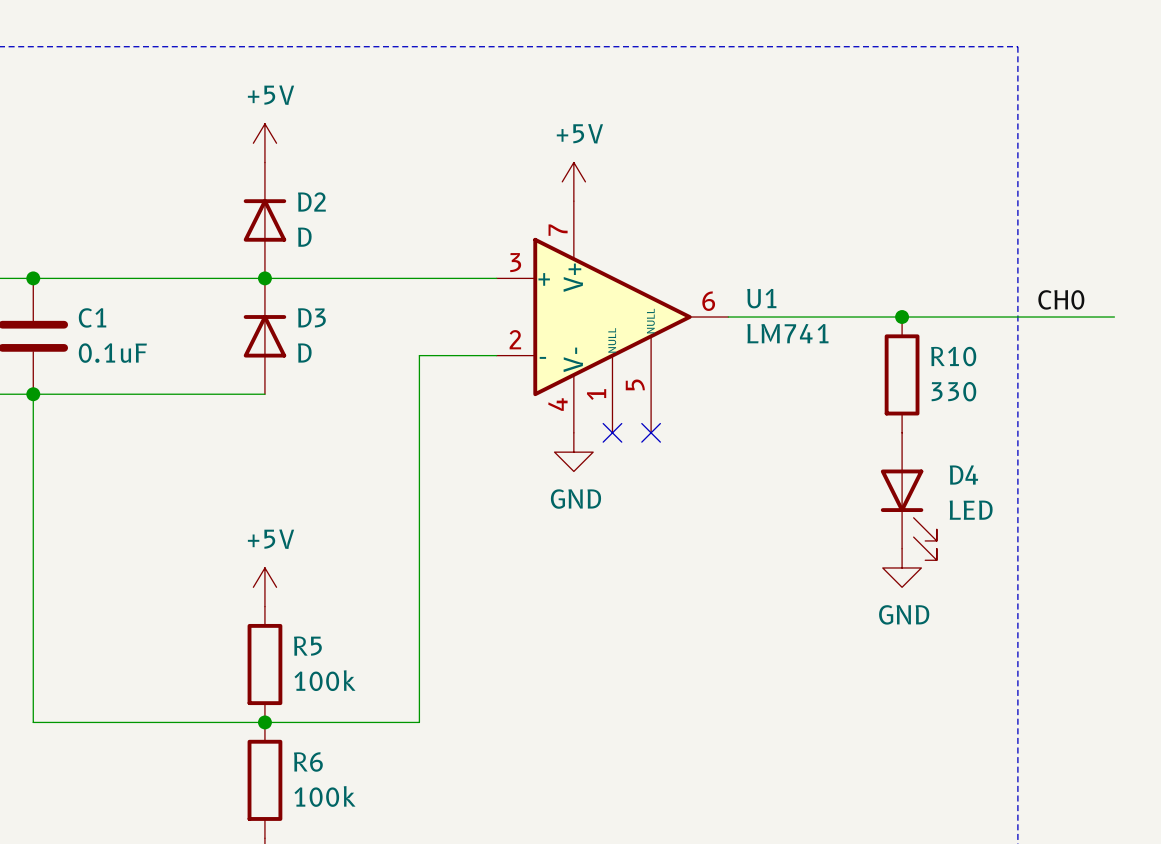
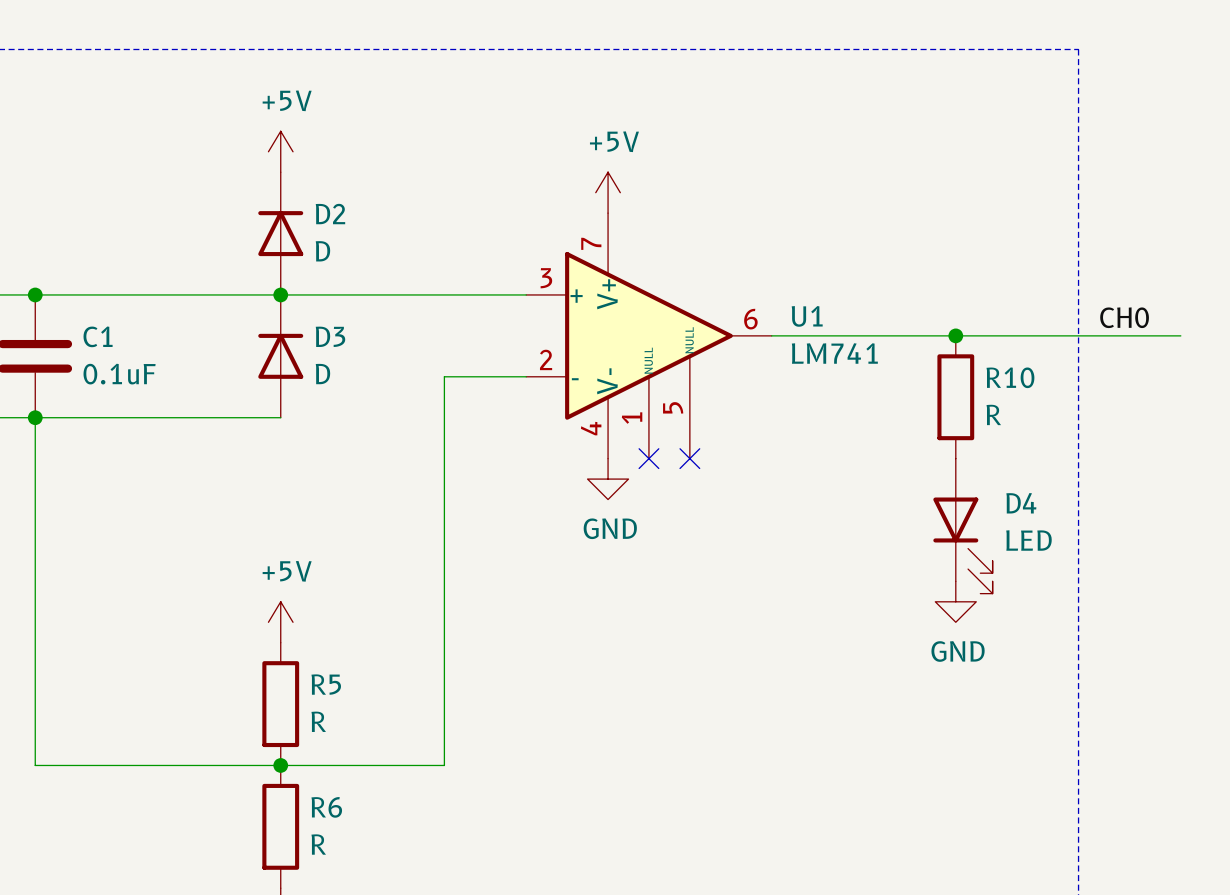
R10 value: 330 (953, 391) -> R (993, 414)
R5 value: 100k (324, 680) -> R (318, 721)
R6 value: 100k (324, 796) -> R (318, 844)

